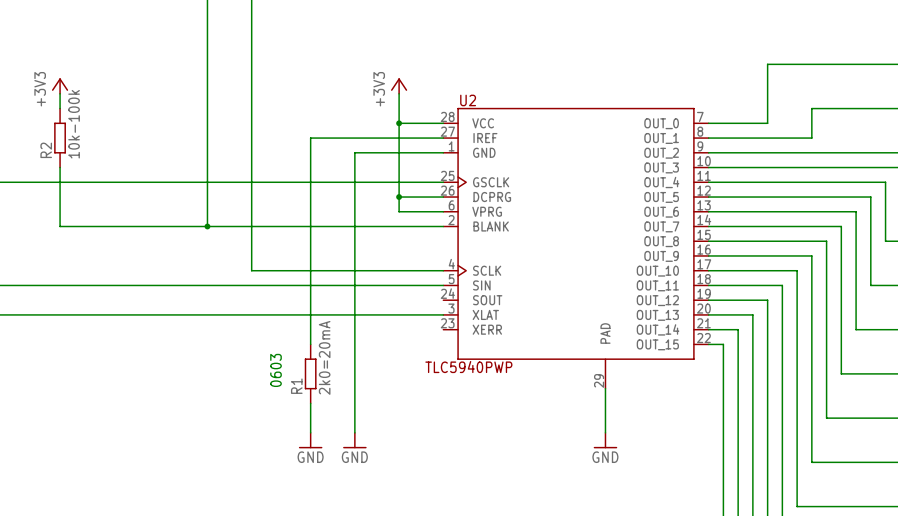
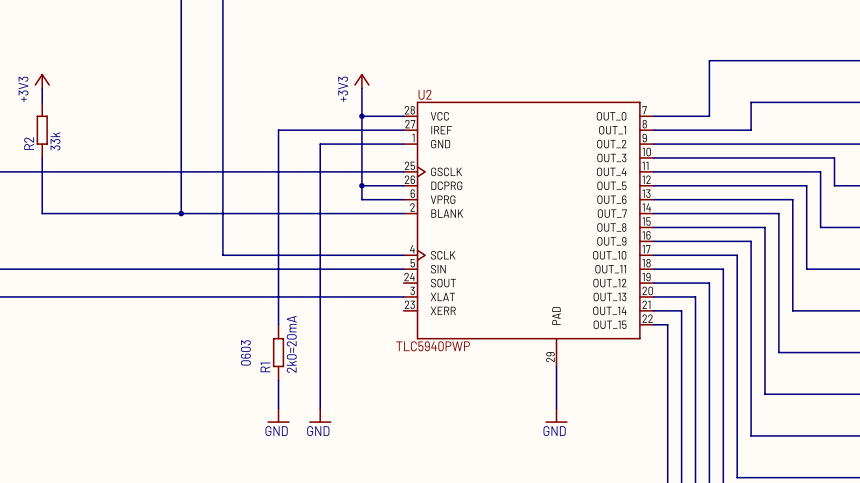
R2 value: 10k-100k (74, 124) -> 33k (55, 141)

